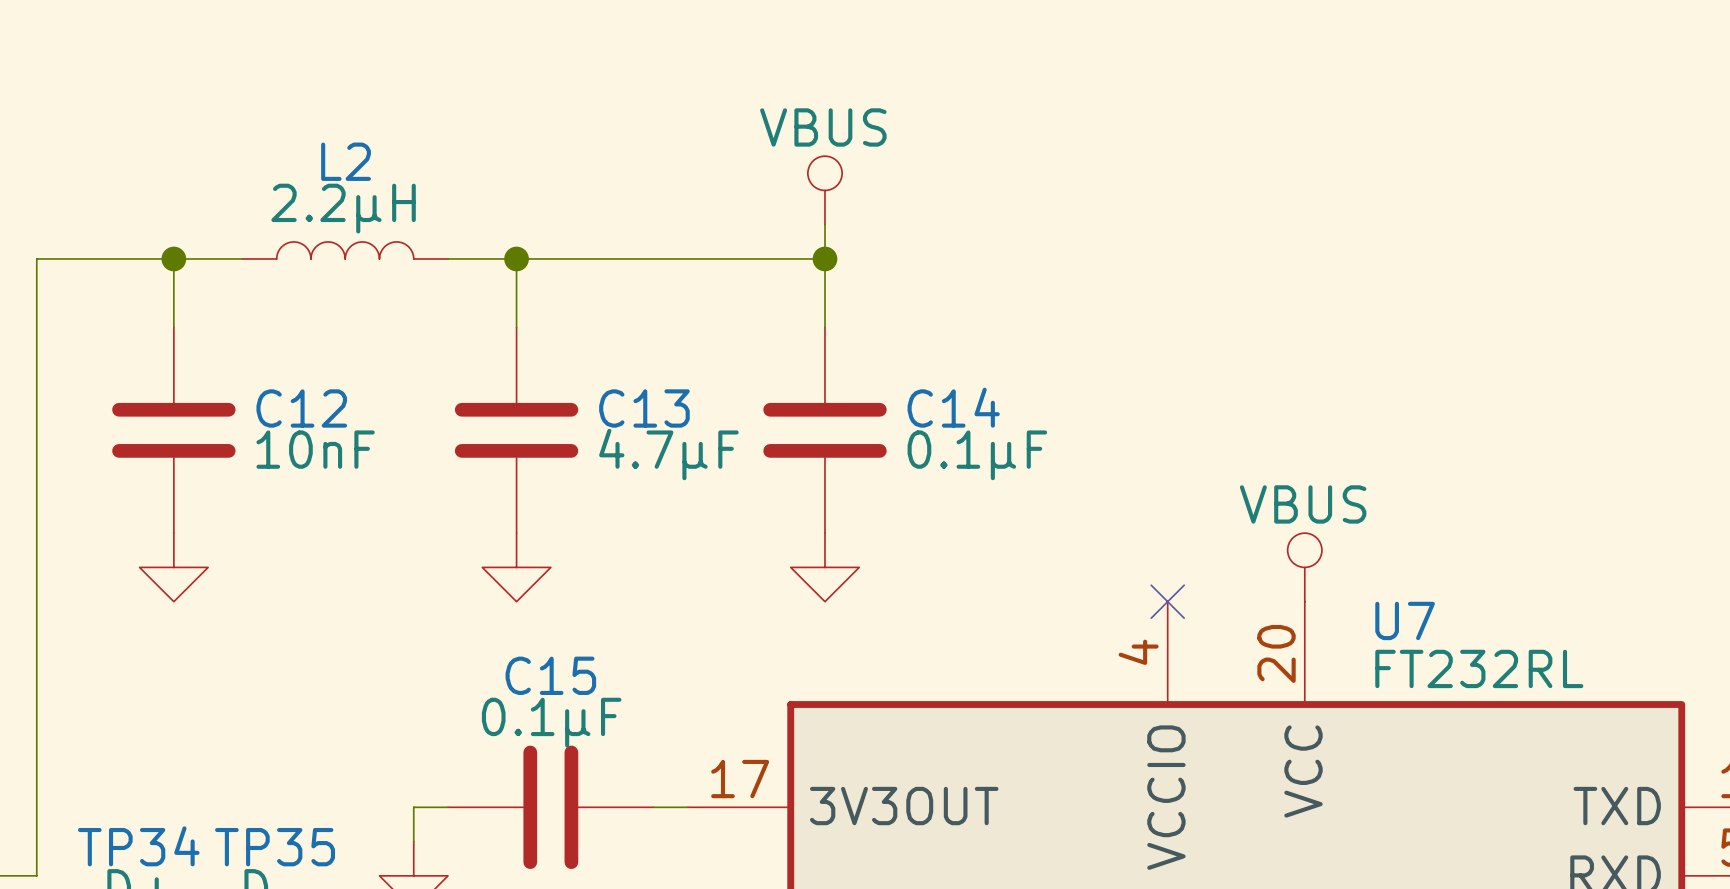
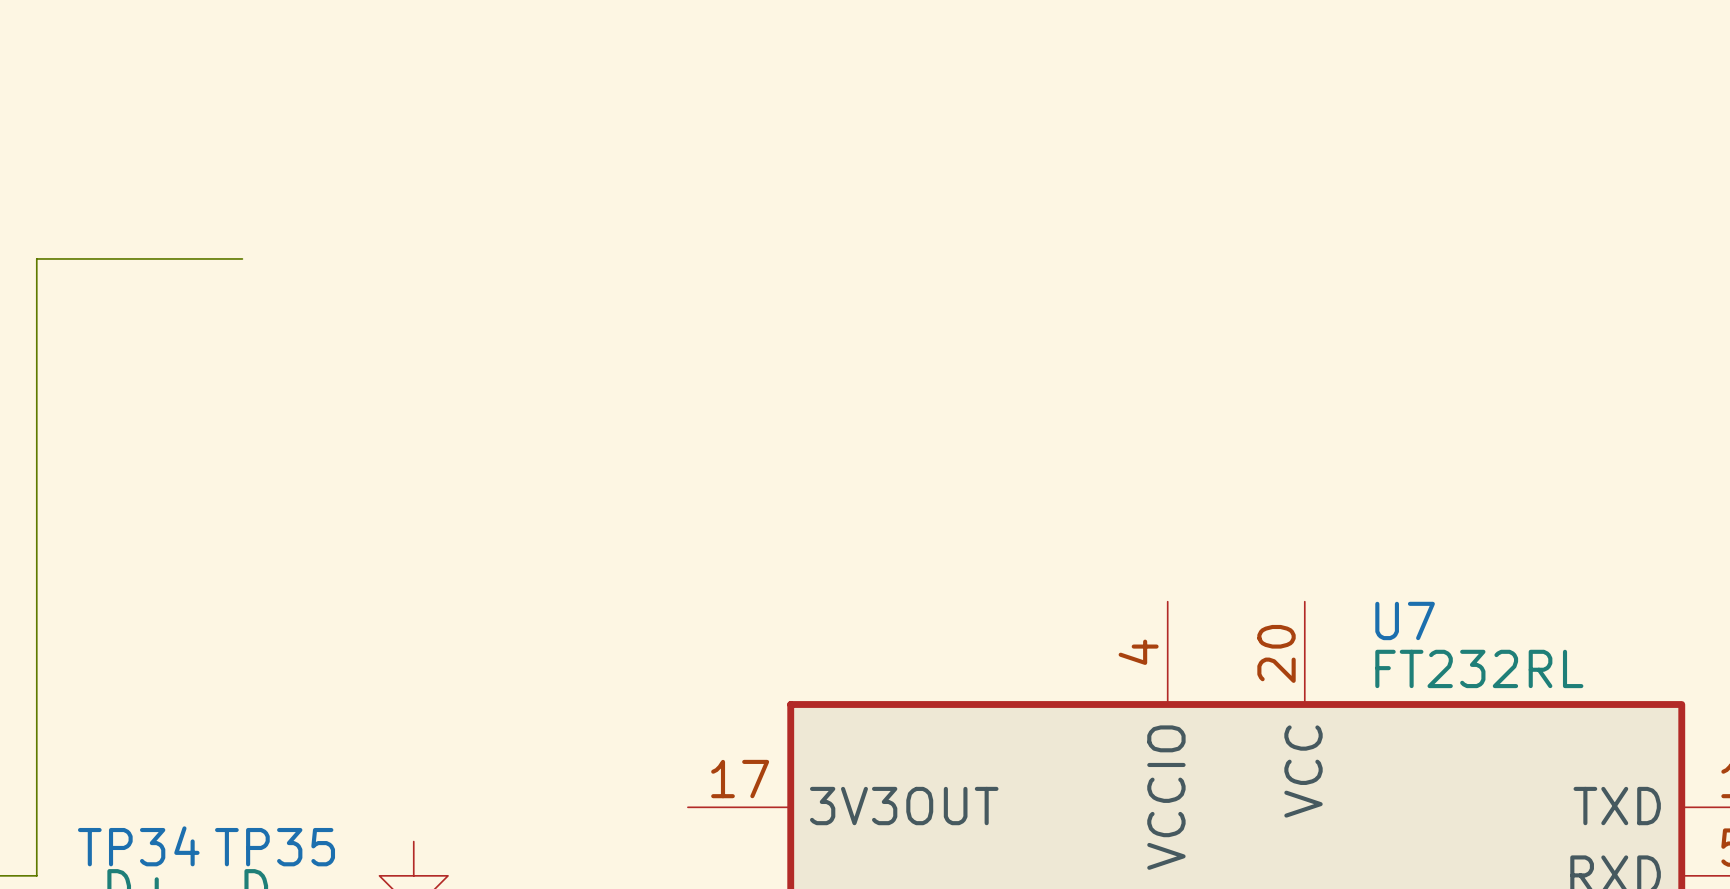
power symbol: VBUS (825, 190) -> none
wire: (825, 224) (825, 327) -> none
L2: 2.2µH (345, 250) -> none
wire: (173, 258) (173, 327) -> none
junction: (173, 258) -> none
wire: (448, 258) (825, 258) -> none
wire: (516, 258) (516, 327) -> none
junction: (516, 258) -> none
junction: (825, 258) -> none
C12: 10nF (173, 430) -> none
C13: 4.7µF (516, 430) -> none
C14: 0.1µF (825, 430) -> none
power symbol: (173, 567) -> none
power symbol: (516, 567) -> none
power symbol: (825, 567) -> none
power symbol: VBUS (1304, 567) -> none
no-connect mark: (1167, 601) -> none
wire: (448, 807) (413, 807) (413, 841) -> none
C15: 0.1µF (550, 807) -> none
wire: (653, 807) (687, 807) -> none

